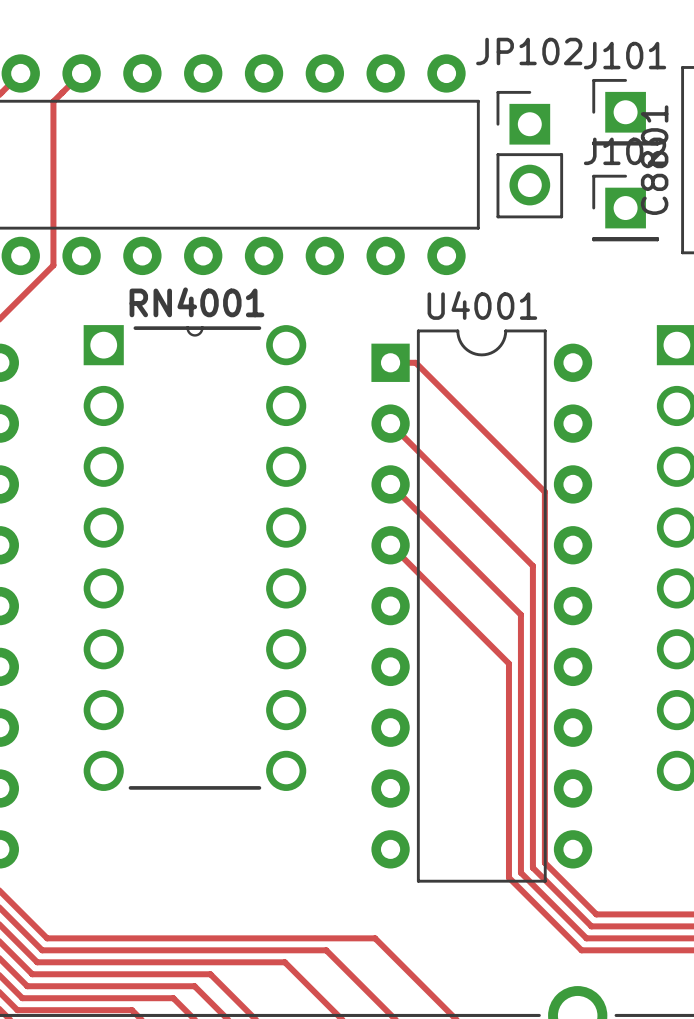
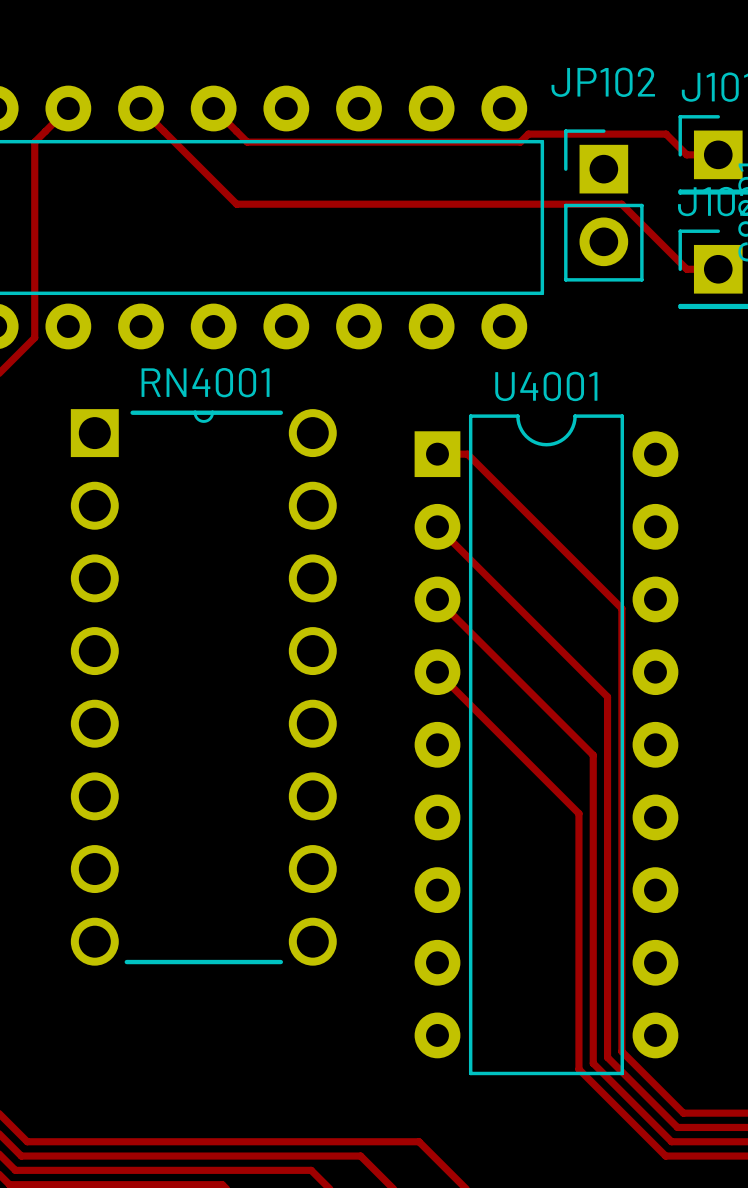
track: none -> (141, 108) (236, 204) (621, 204) (686, 269) (718, 269)
track: none -> (213, 108) (247, 142) (520, 142) (528, 134) (666, 134) (686, 154) (718, 154)

